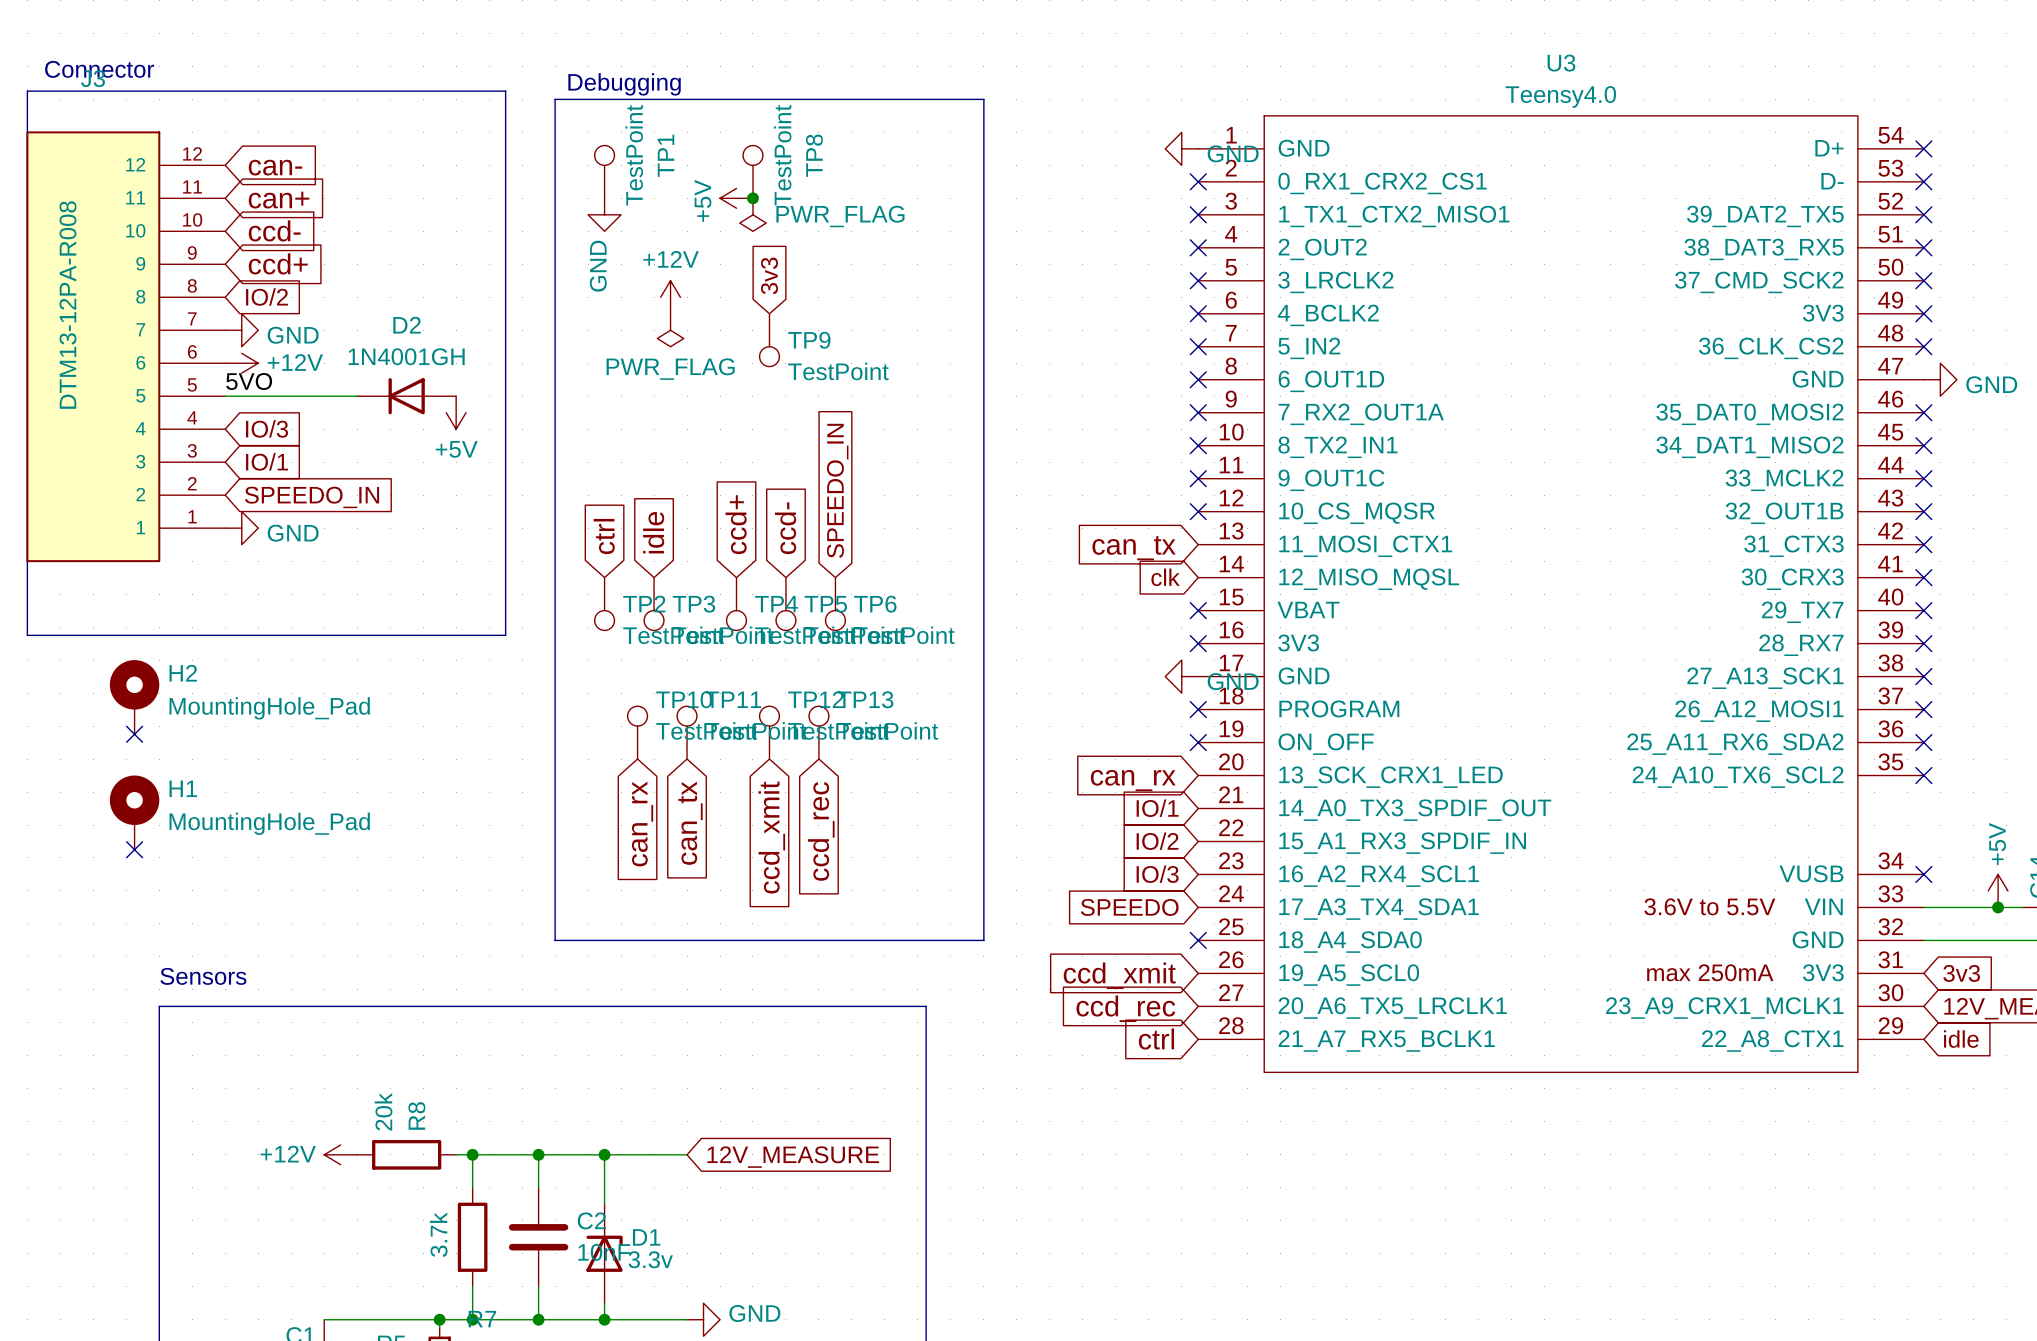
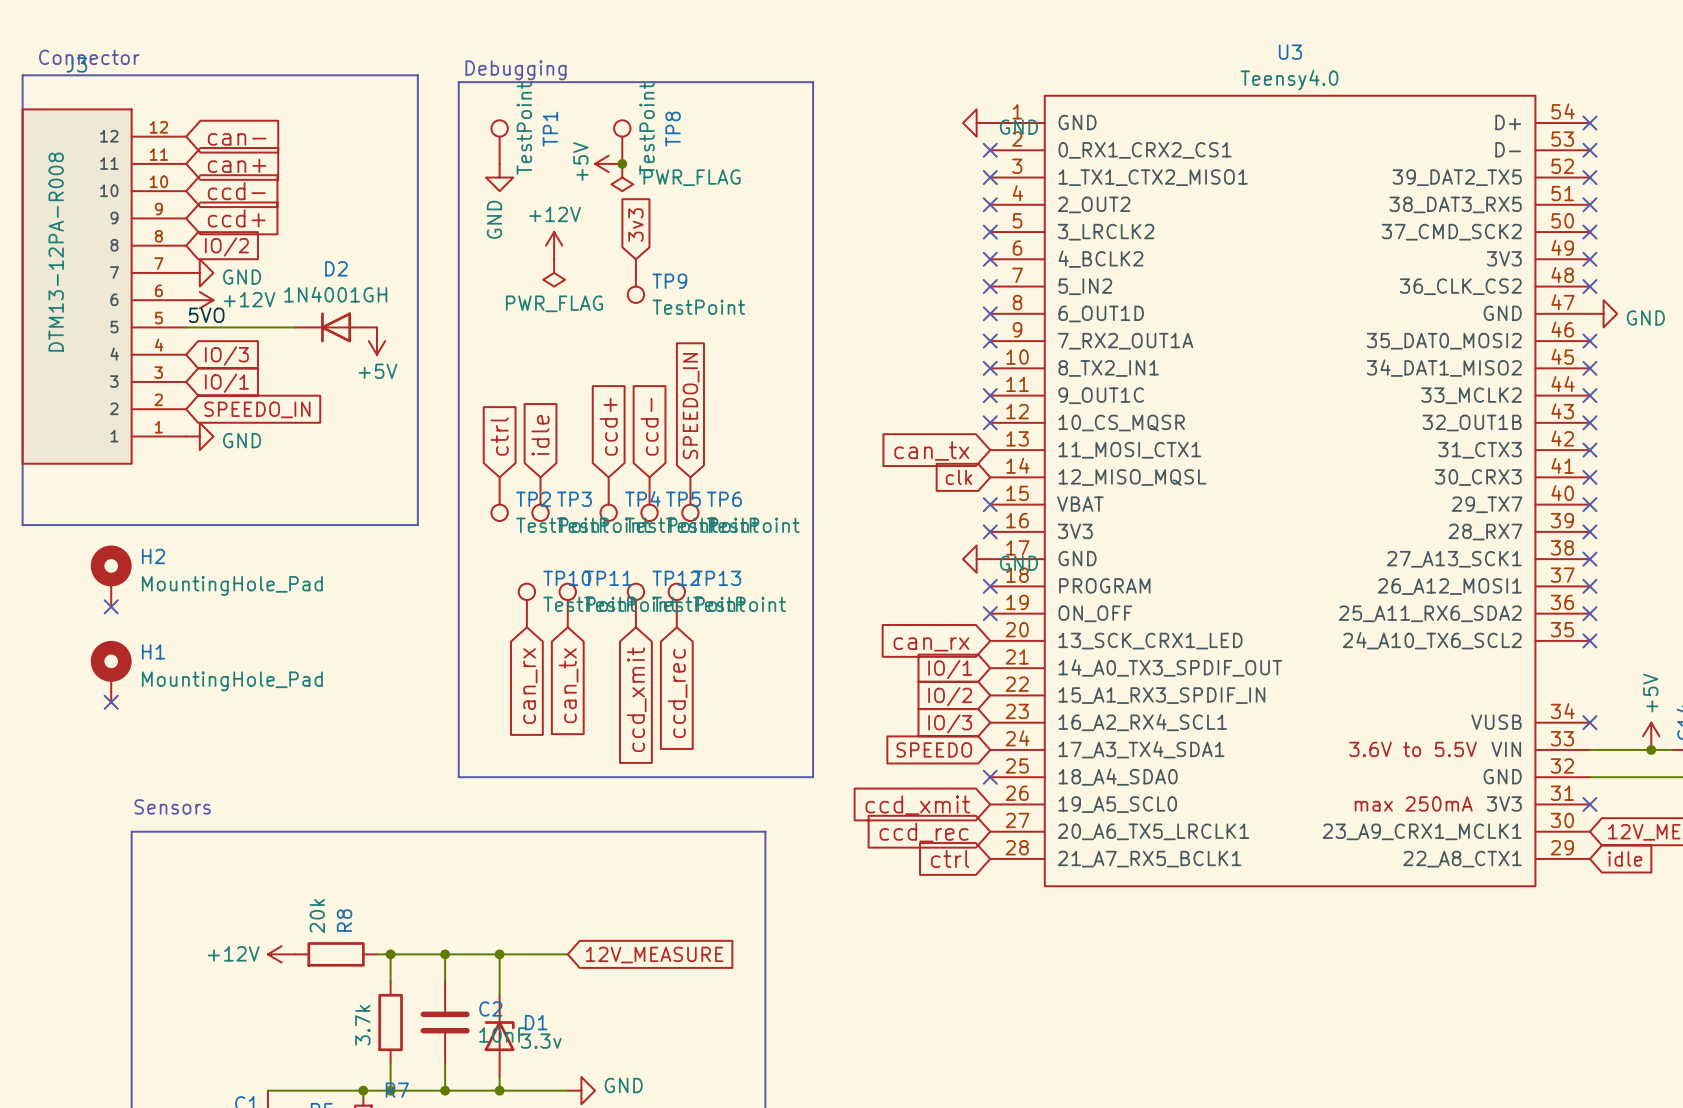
no-connect mark: none -> (1589, 804)
global label: 3v3 (1961, 973) -> none

